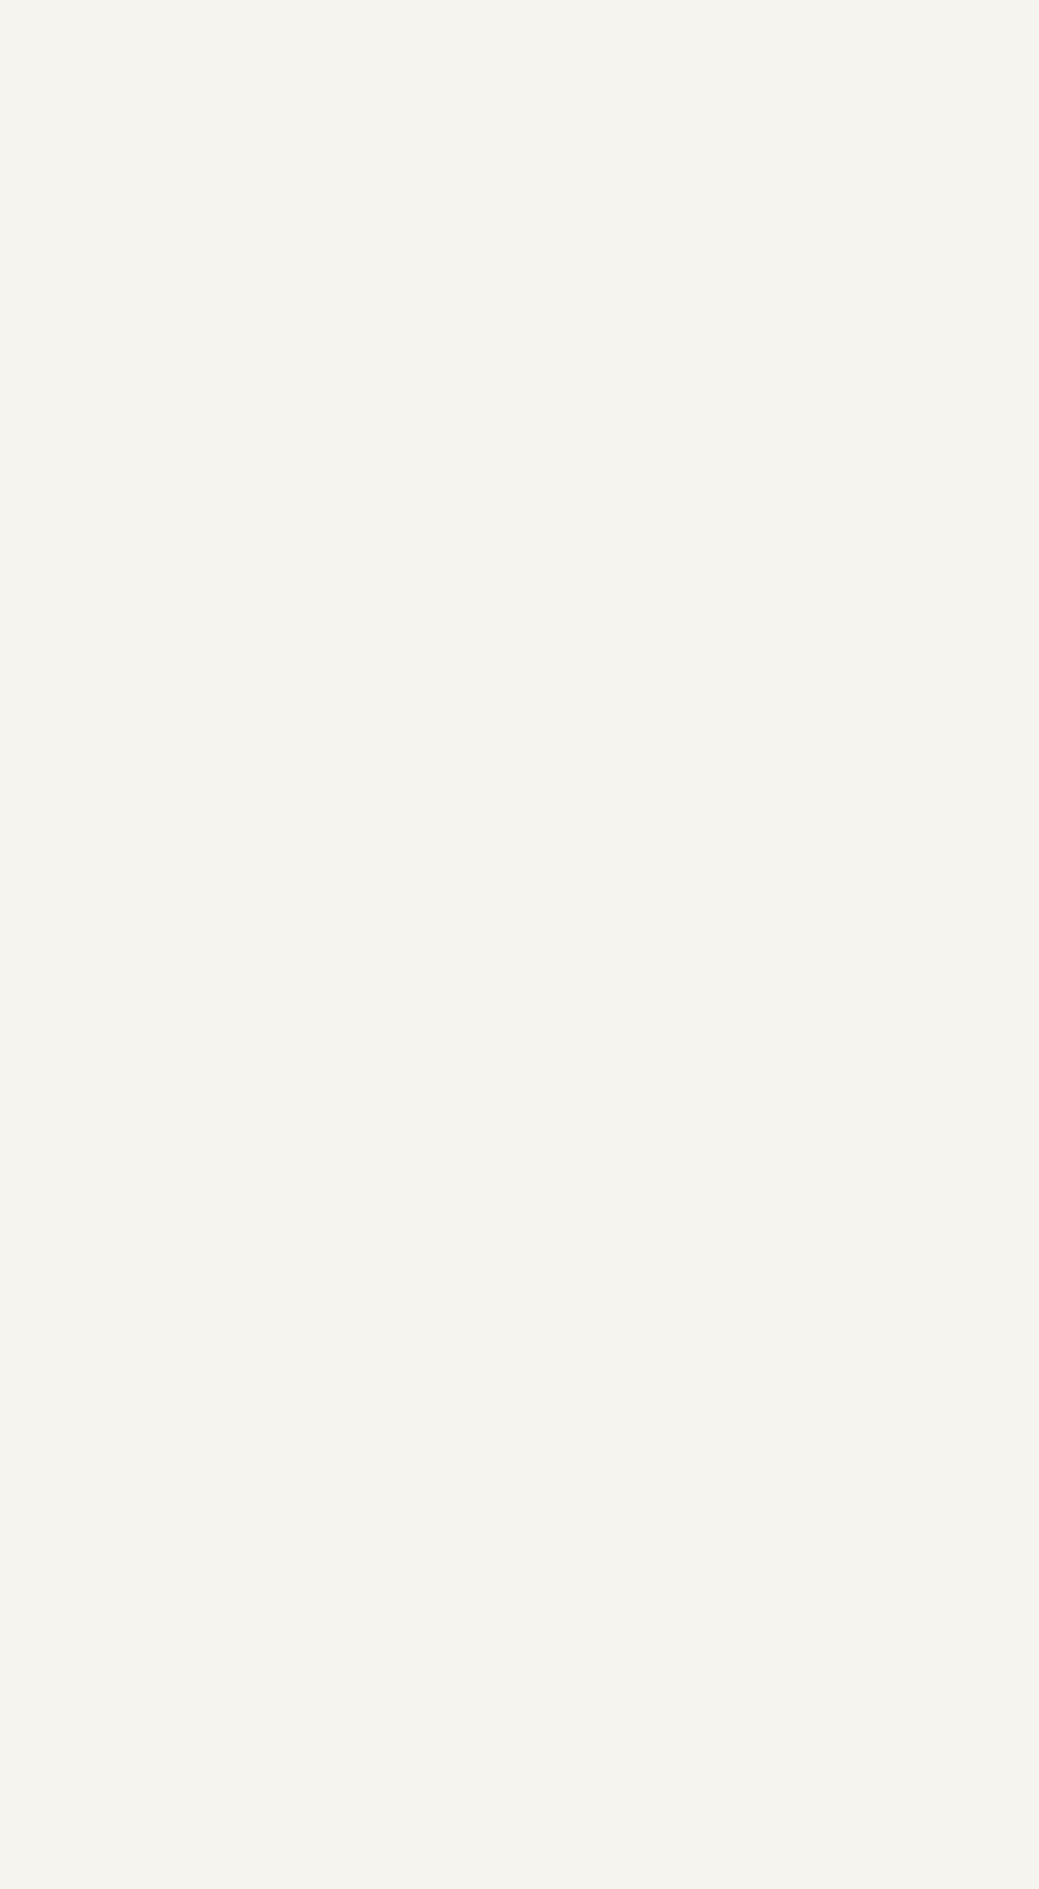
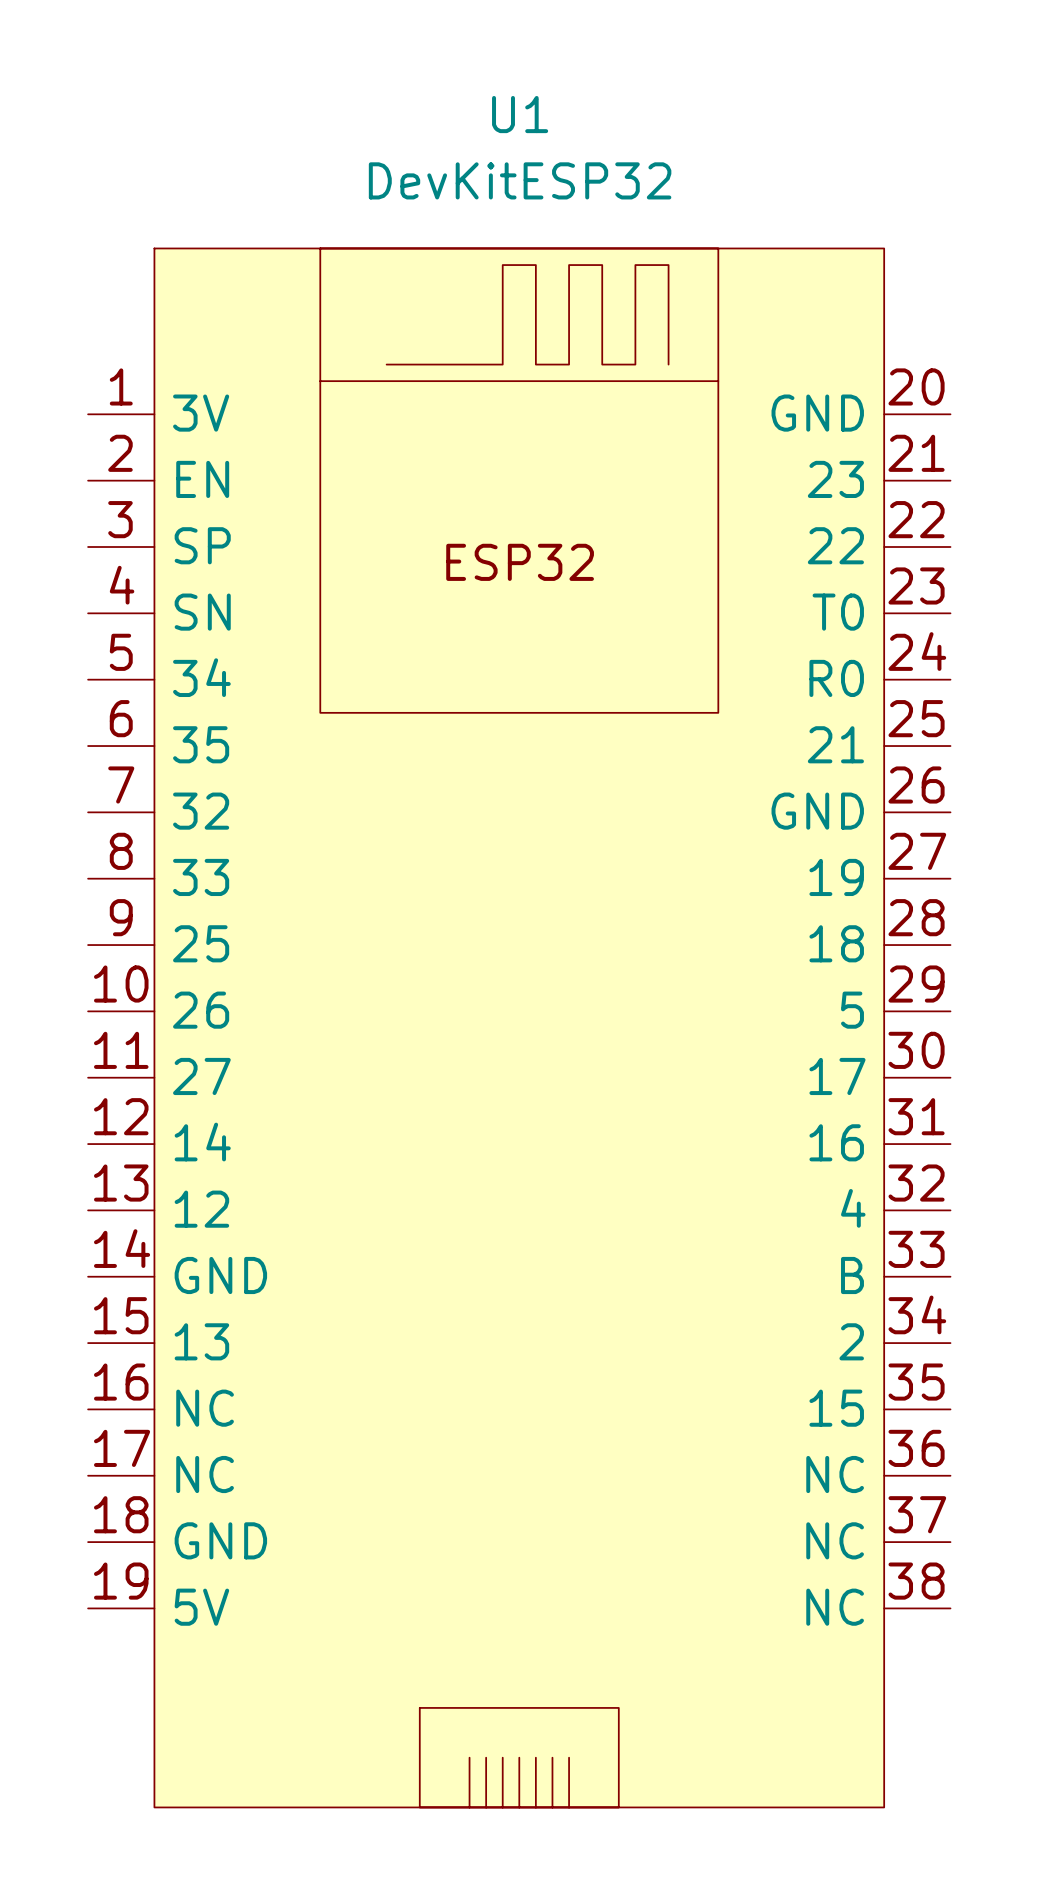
U1: none -> DevKitESP32 (519, 1027)

